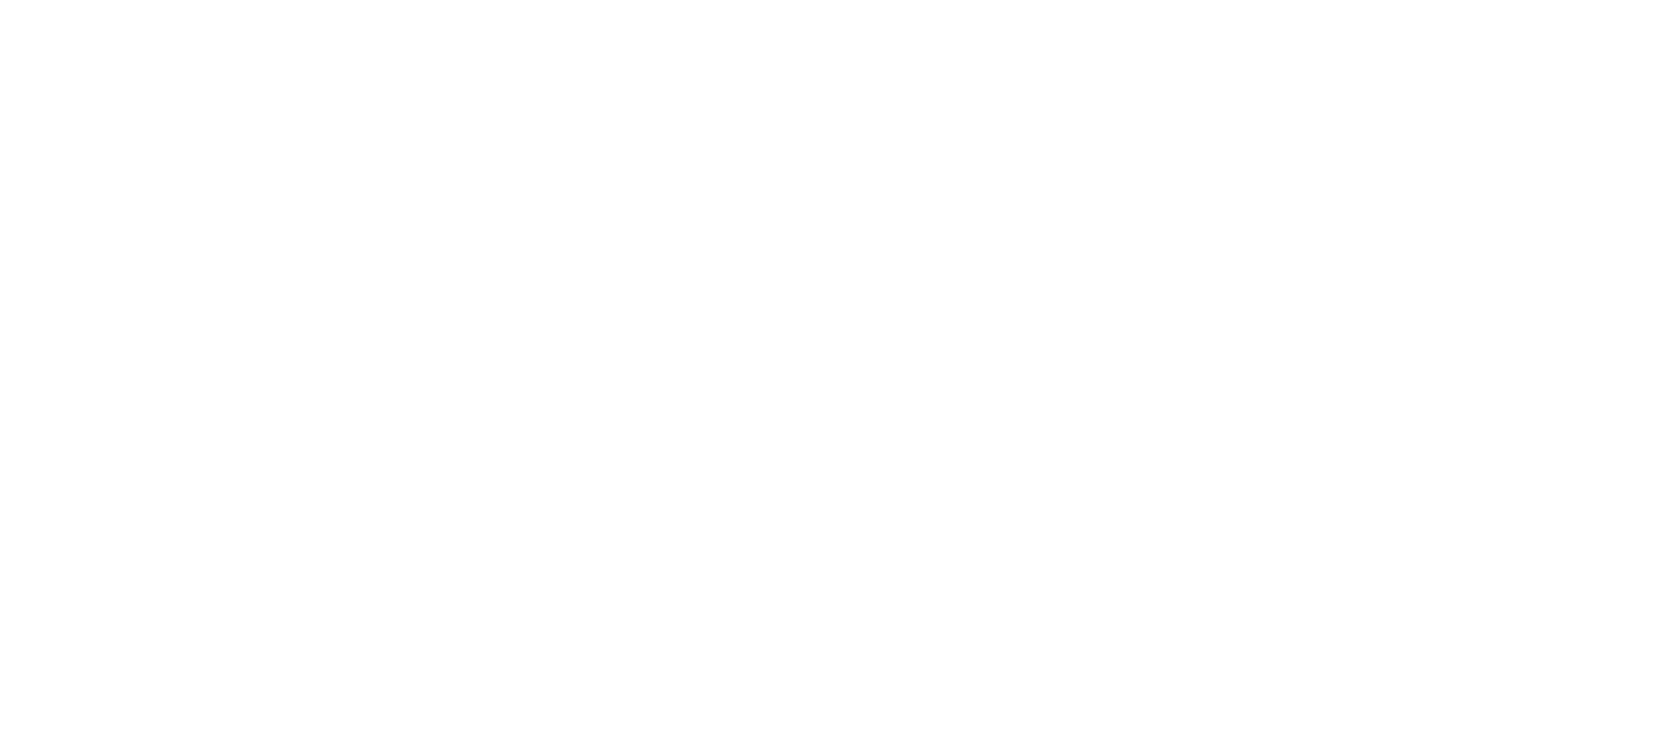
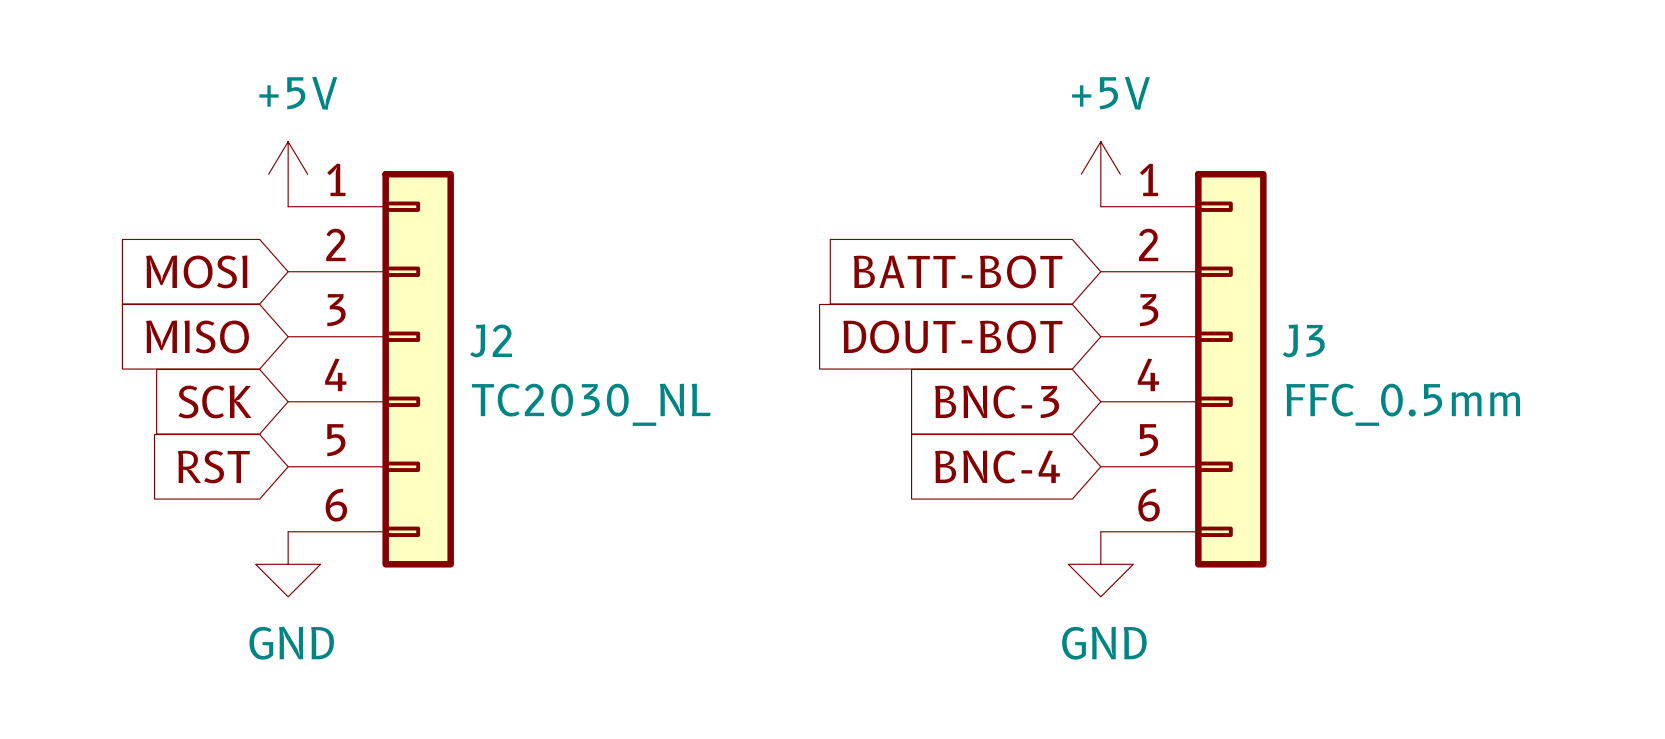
power symbol: none -> +5V (288, 174)
power symbol: none -> +5V (1100, 174)
global label: none -> MOSI (196, 271)
global label: none -> BATT-BOT (958, 271)
global label: none -> MISO (197, 336)
global label: none -> DOUT-BOT (952, 336)
J2: none -> TC2030_NL (371, 369)
J3: none -> FFC_0.5mm (1183, 369)
global label: none -> SCK (214, 401)
global label: none -> BNC-3 (997, 401)
global label: none -> RST (213, 466)
global label: none -> BNC-4 (997, 466)
power symbol: none -> GND (288, 564)
power symbol: none -> GND (1100, 564)

